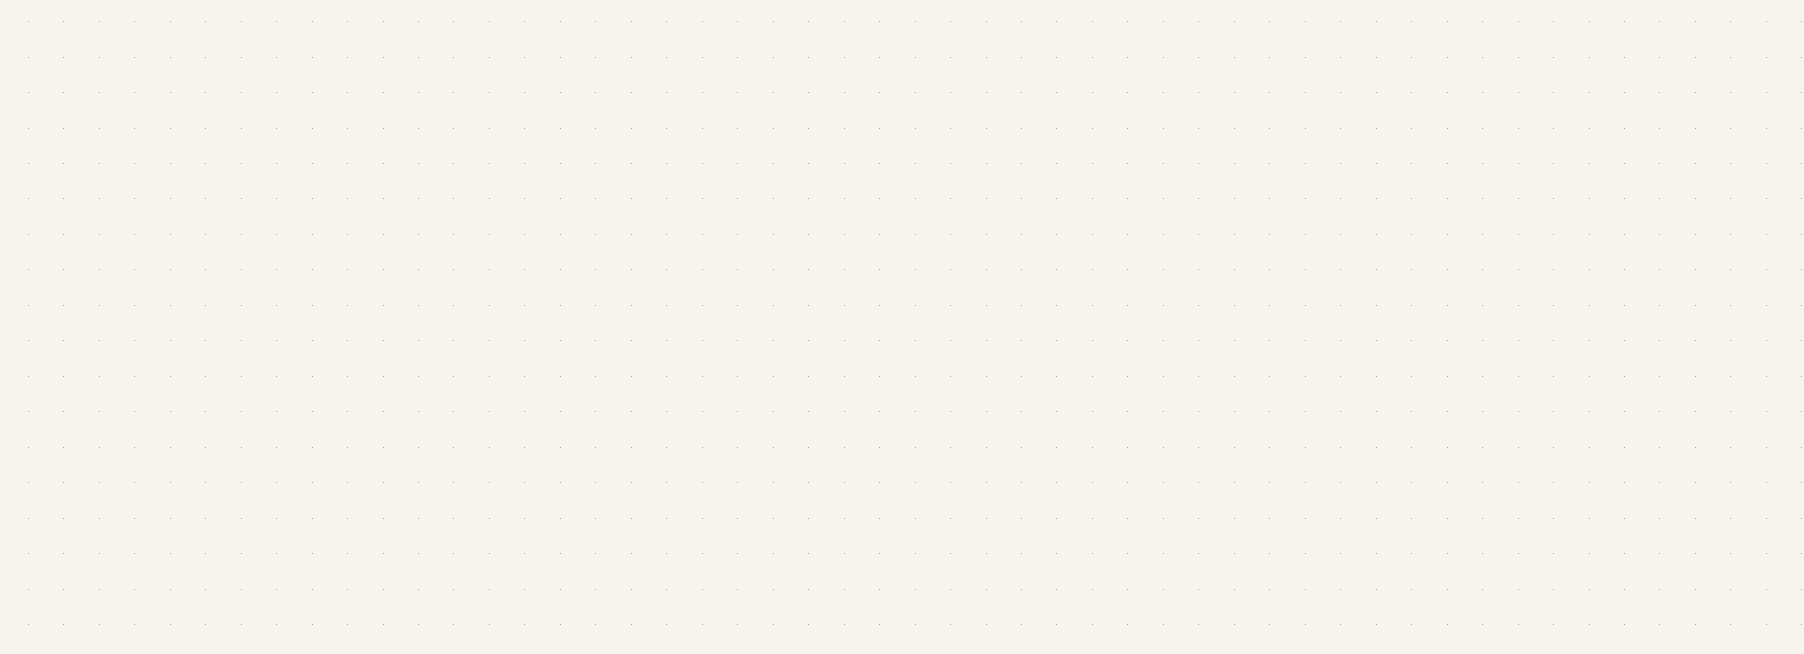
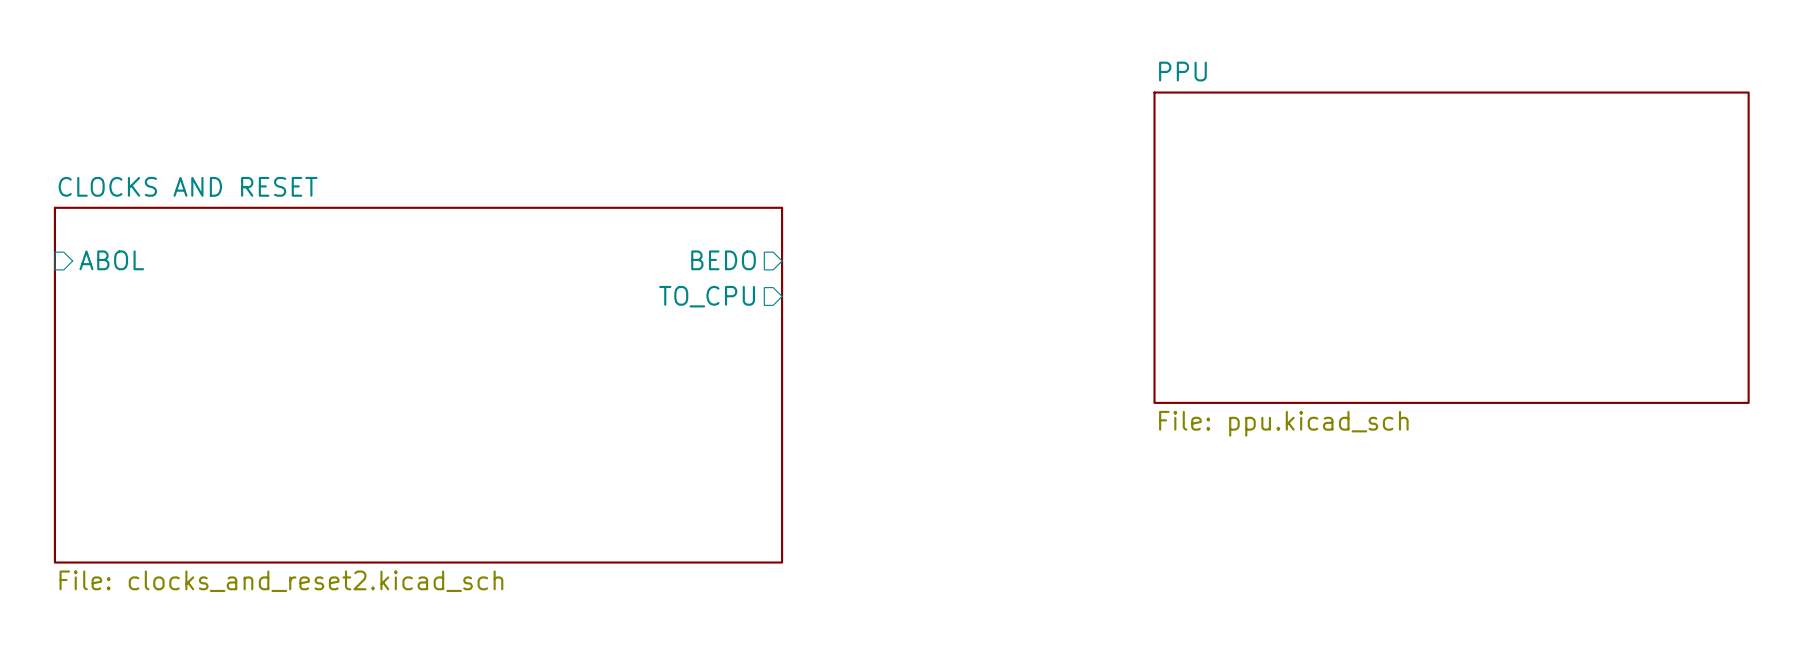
sheet PPU: none -> File: ppu.kicad_sch (1451, 247)
sheet pin: none -> ABOL (111, 260)
sheet pin: none -> BEDO (723, 260)
sheet pin: none -> TO_CPU (707, 296)
sheet CLOCKS AND RESET: none -> File: clocks_and_reset2.kicad_sch (418, 385)

